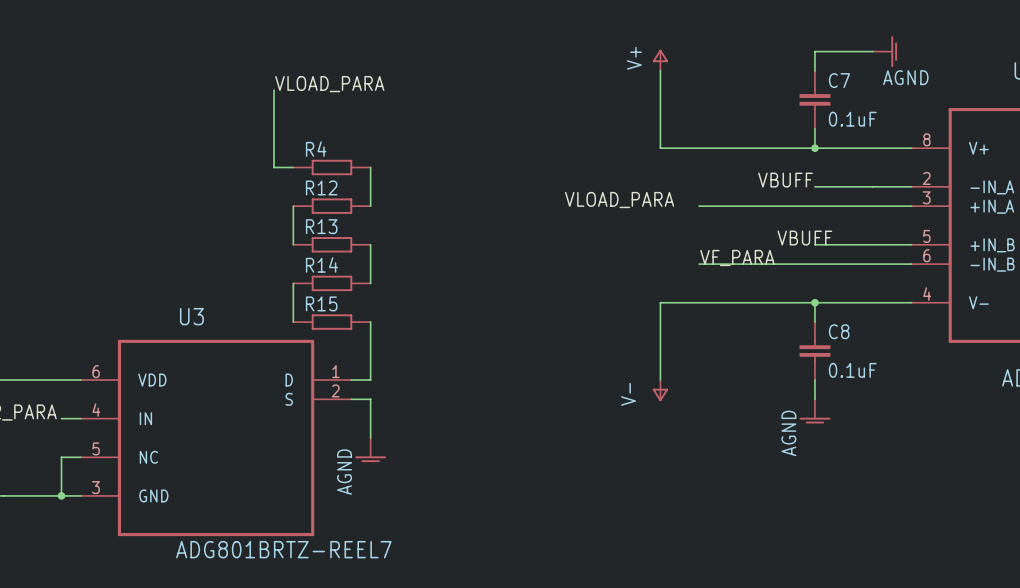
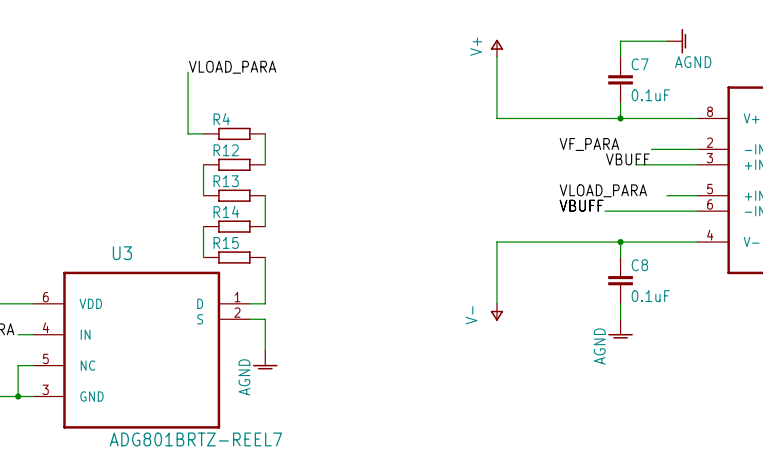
label position: VBUFF (785, 180) -> VBUFF (627, 159)
wire: (814, 186) (853, 186) -> none
label position: VLOAD_PARA (619, 200) -> VLOAD_PARA (603, 190)
wire: (699, 206) (834, 206) -> none
label position: VBUFF (804, 238) -> VBUFF (581, 205)
wire: (814, 244) (872, 244) -> none
label position: VF_PARA (737, 257) -> VF_PARA (589, 144)
wire: (699, 264) (795, 264) -> none

